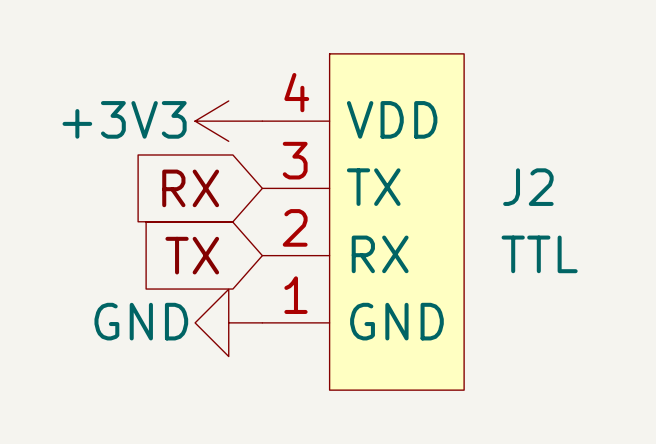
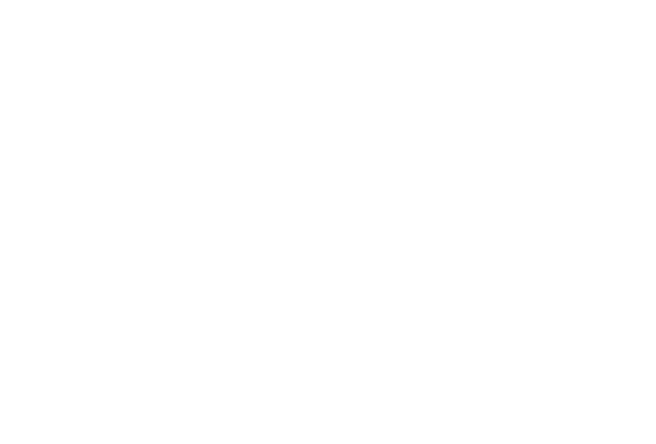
power symbol: +3V3 (228, 121) -> none
global label: RX (190, 188) -> none
J2: TTL (363, 222) -> none
global label: TX (192, 255) -> none
power symbol: GND (228, 322) -> none

